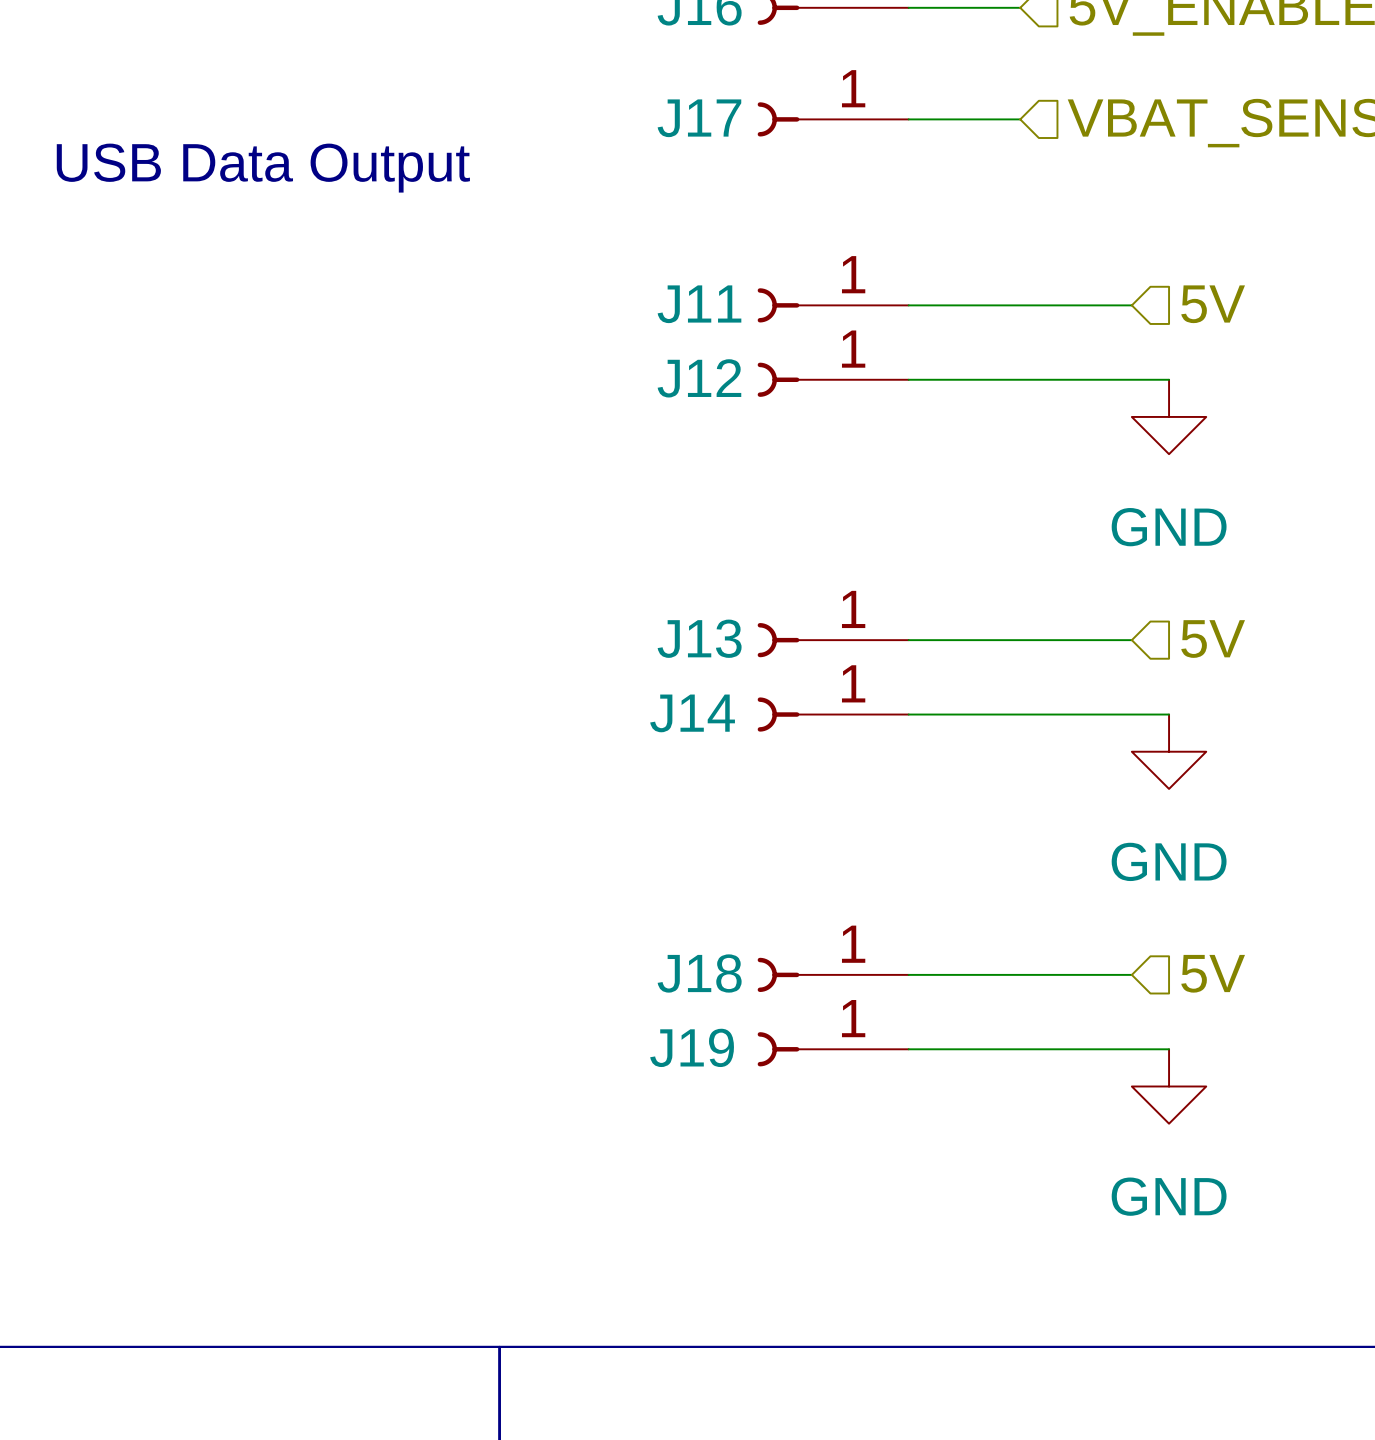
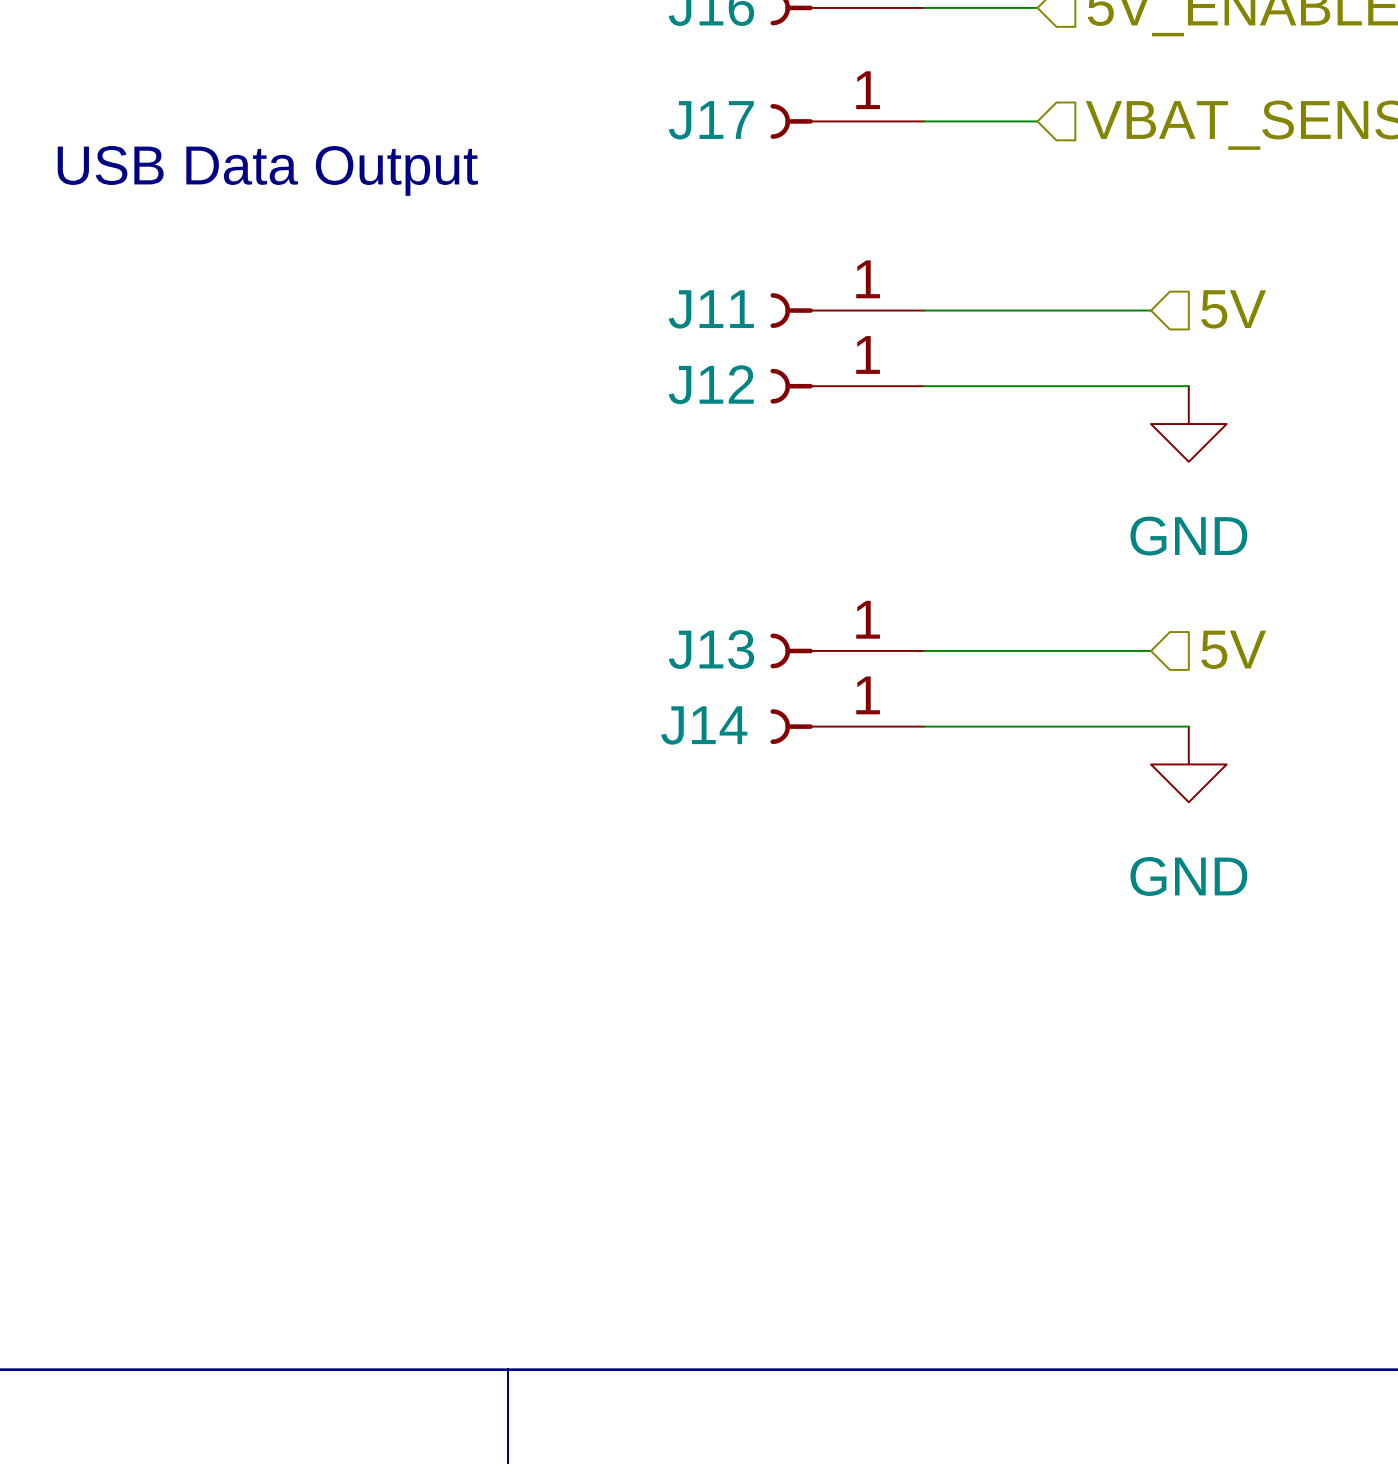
hierarchical label: 5V (1213, 973) -> none
J18: (833, 974) -> none
wire: (908, 974) (1131, 974) -> none
J19: (833, 1049) -> none
wire: (908, 1049) (1169, 1049) -> none
power symbol: GND (1169, 1086) -> none

